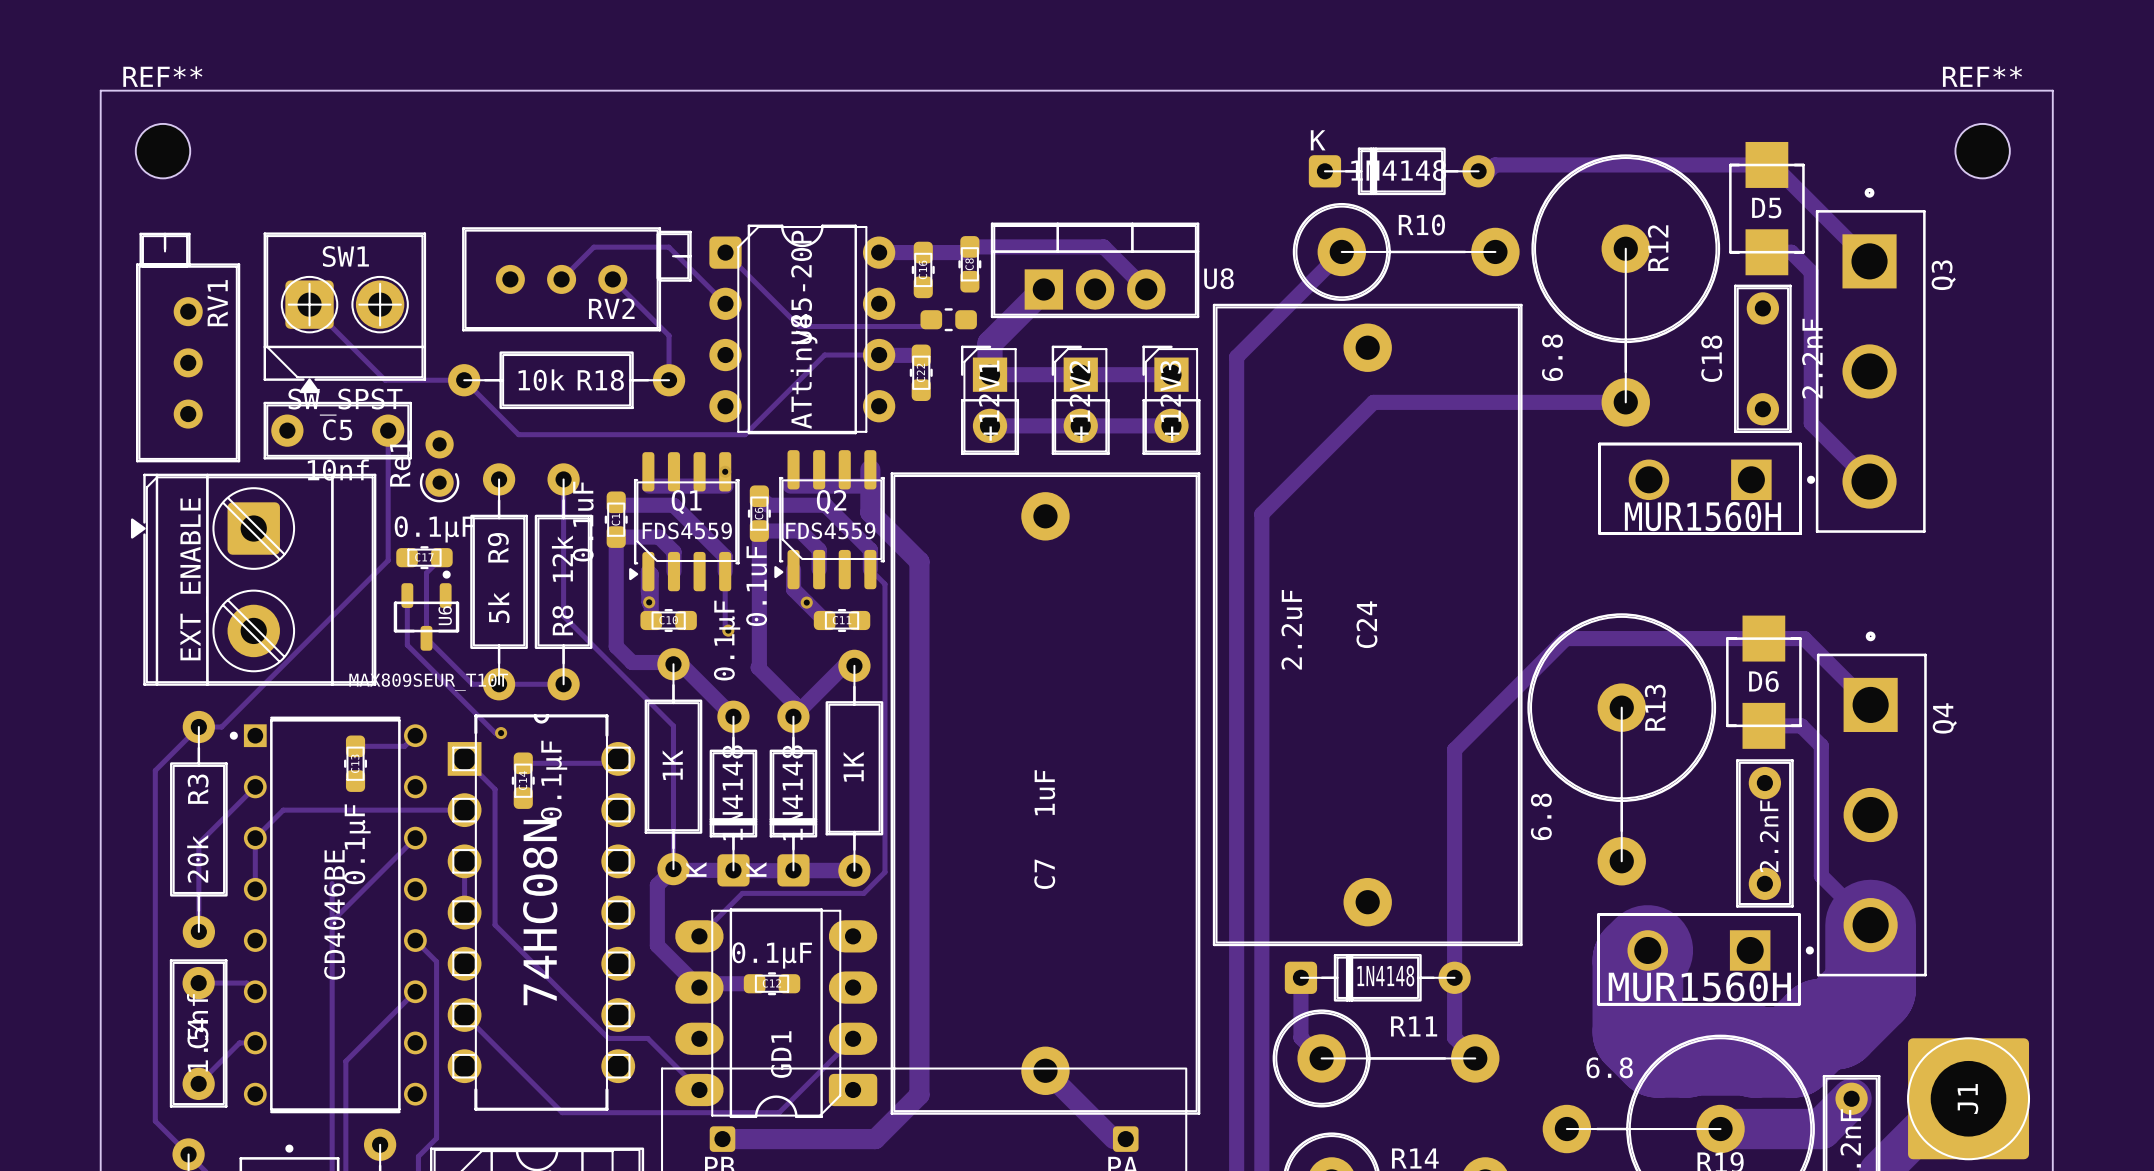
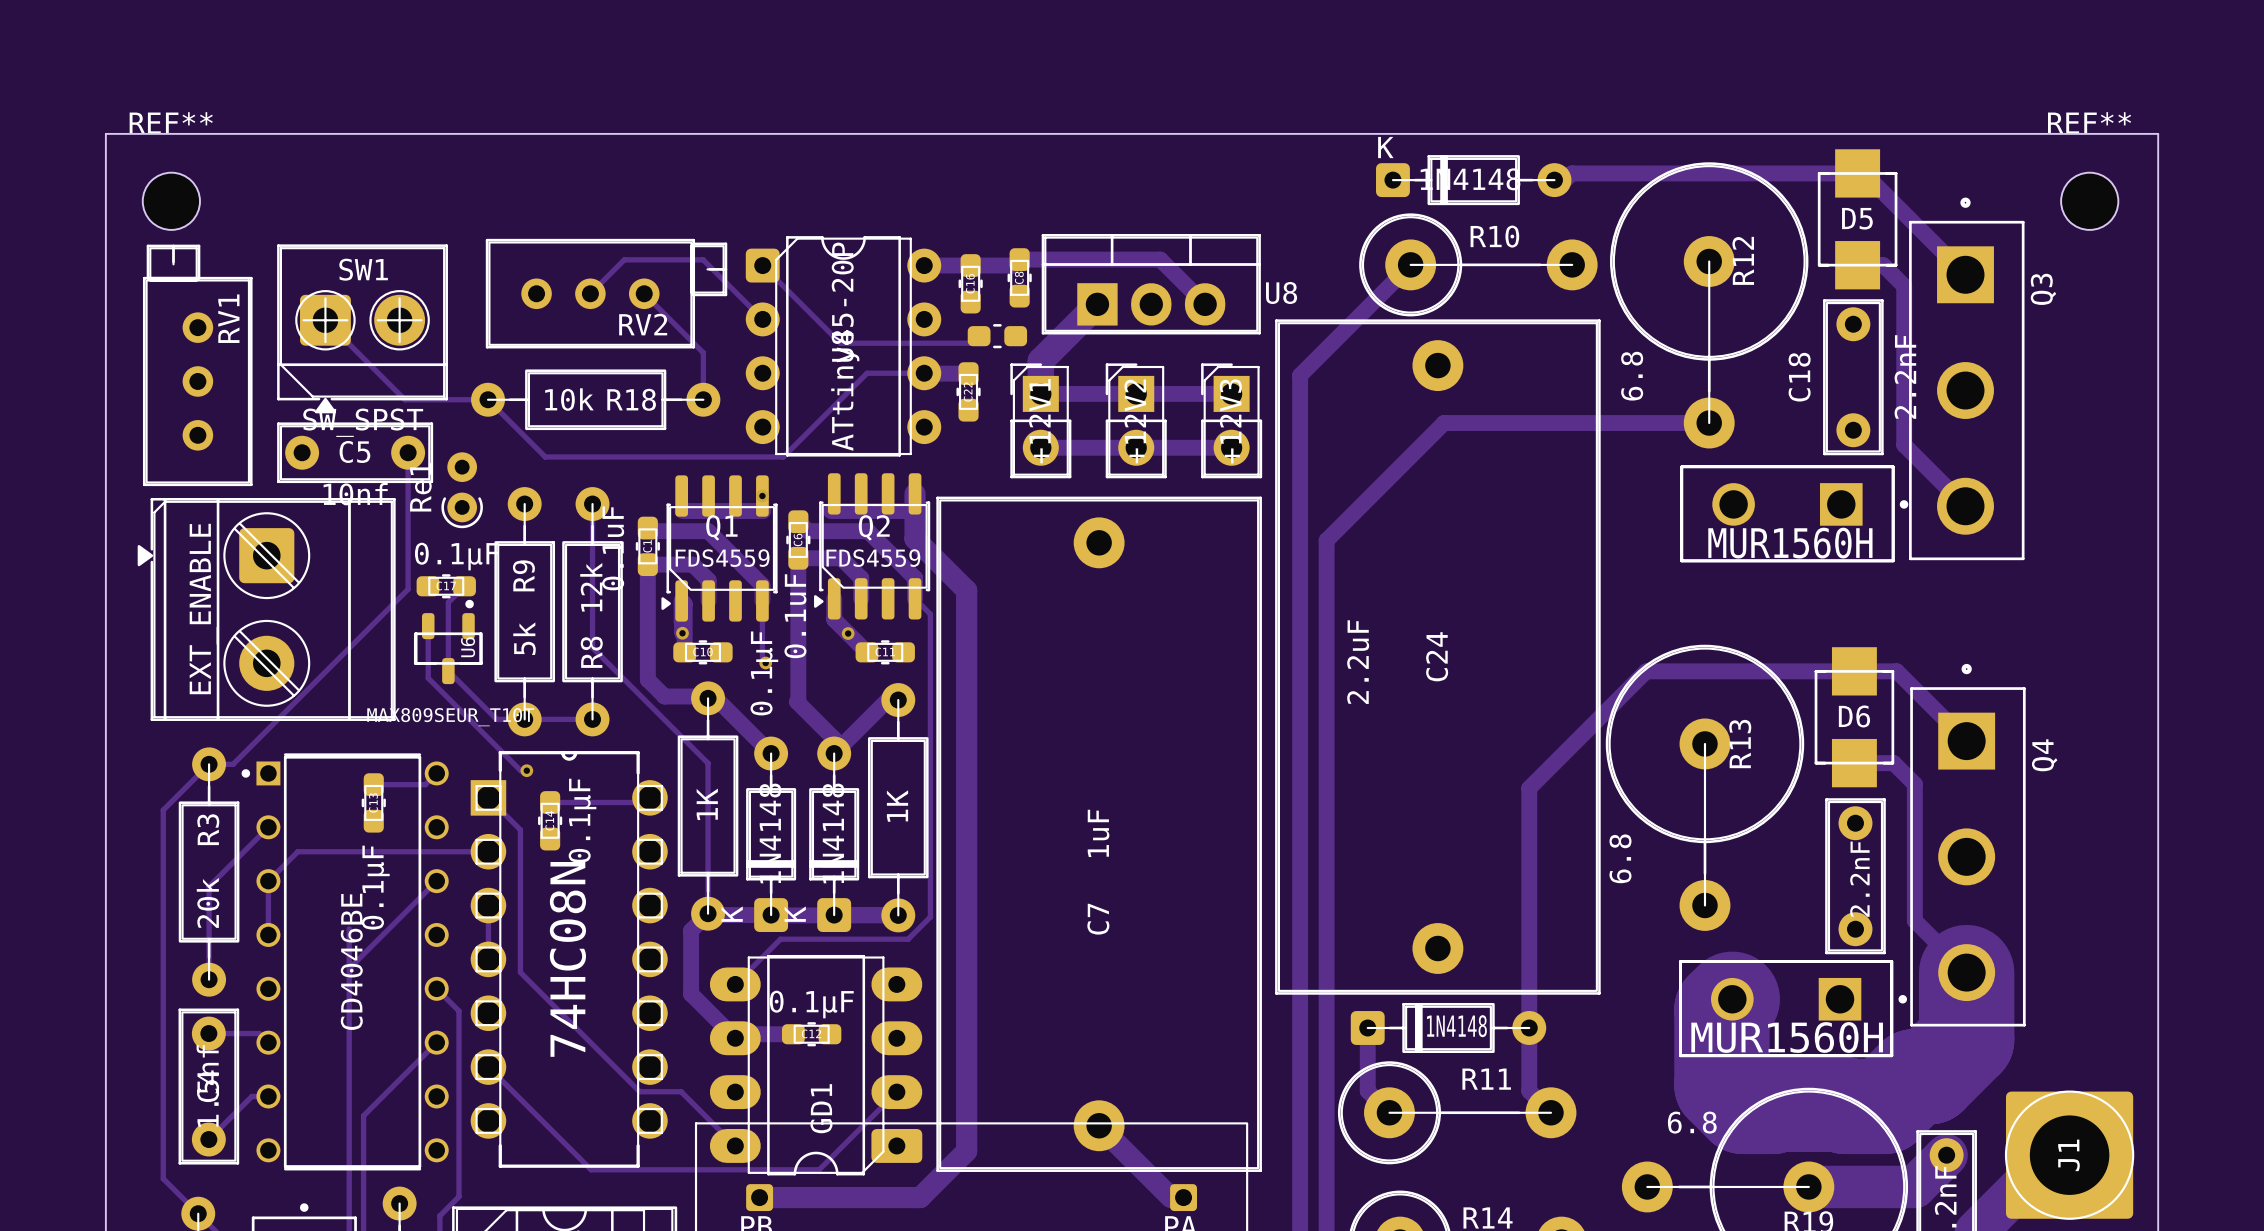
board edge: (100, 127) (100, 90) (2052, 90) (2052, 127) -> (105, 133) (2158, 133)
REF** position: (163, 151) -> (171, 201)
REF** position: (1982, 151) -> (2089, 201)

